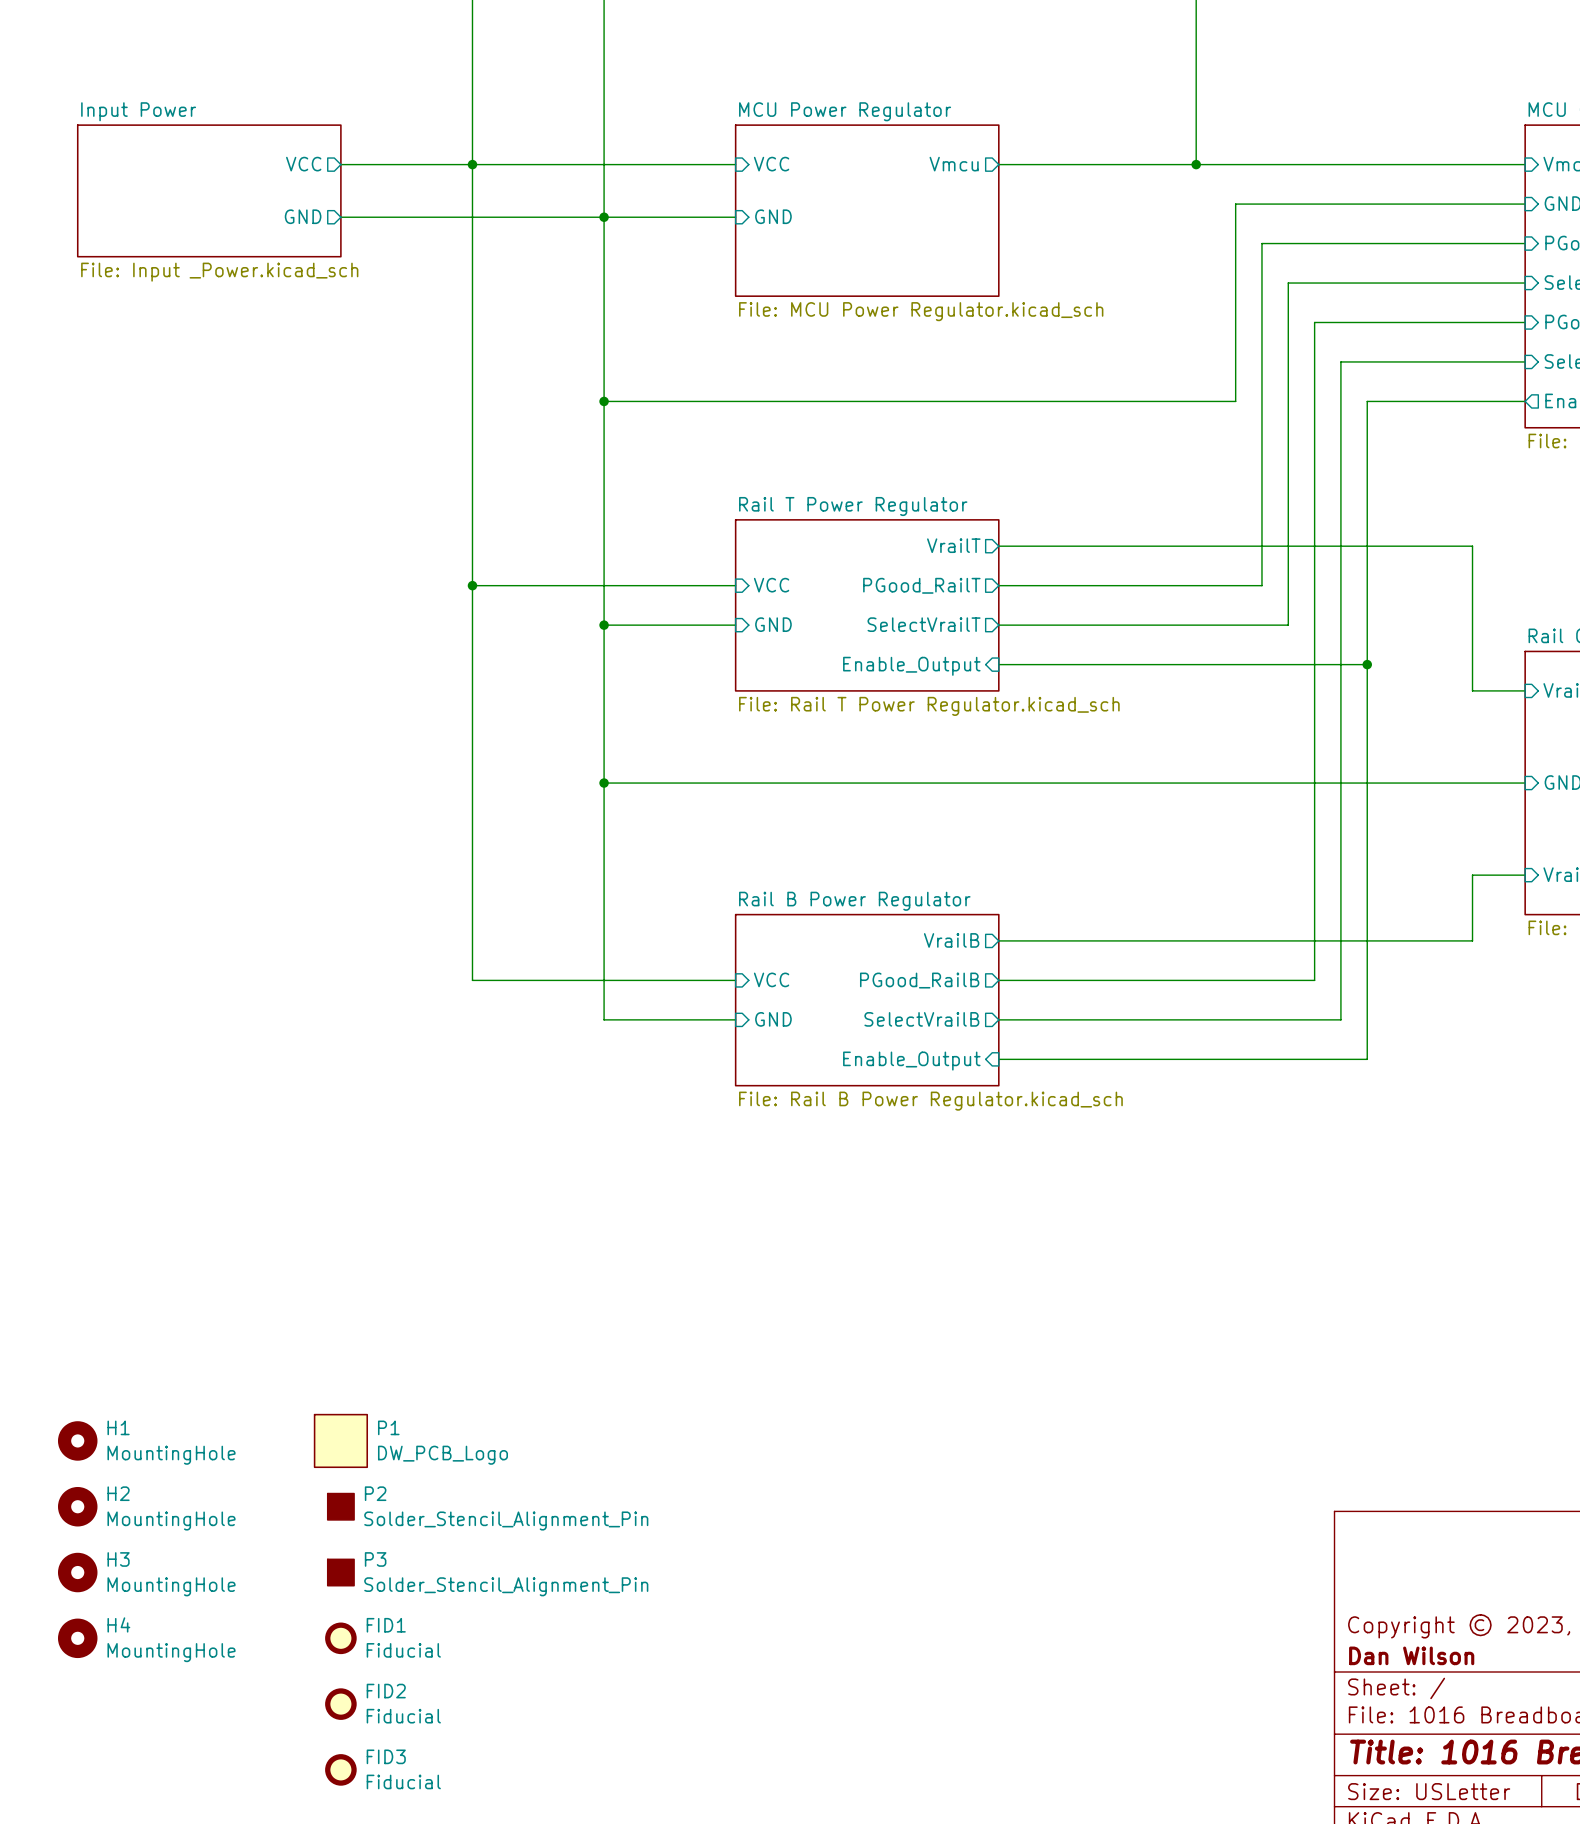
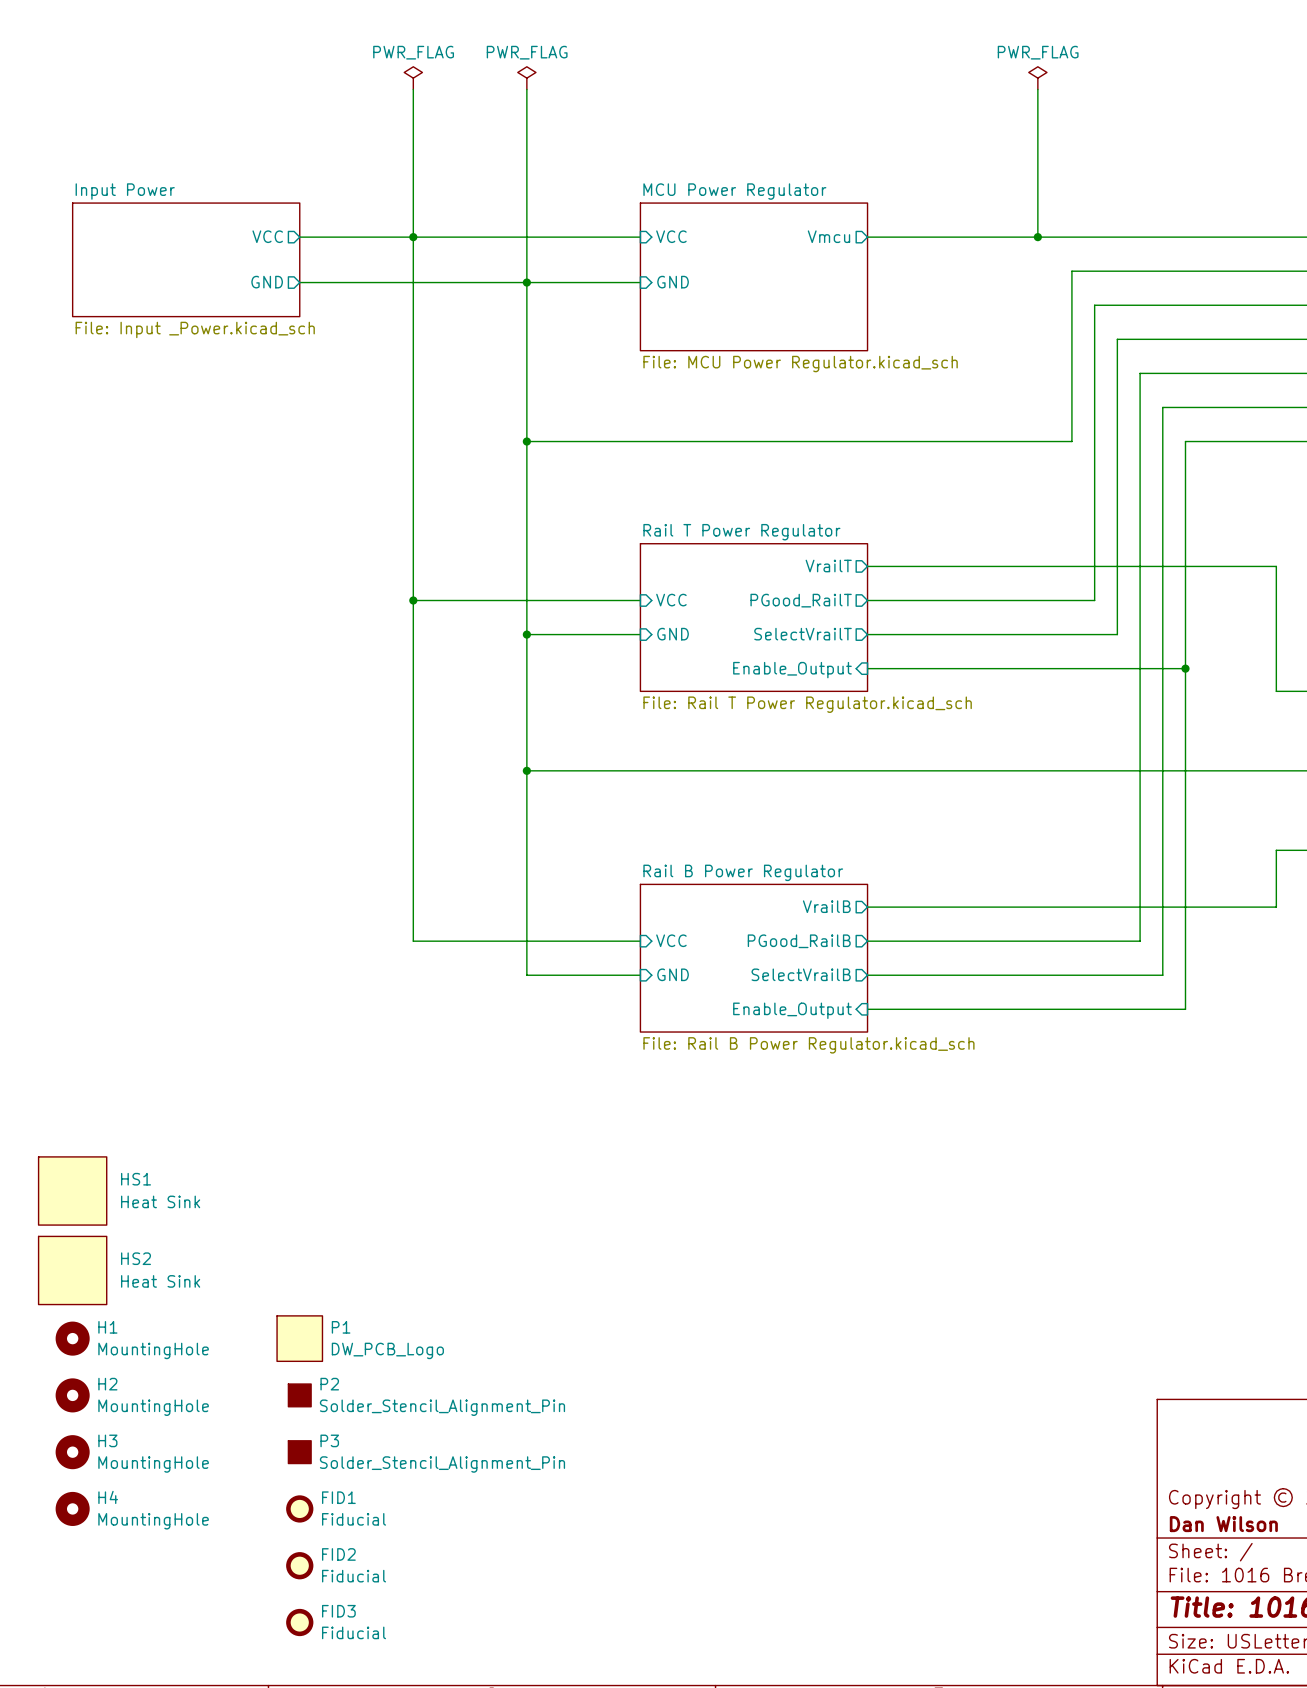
HS1: none -> Heat Sink (72, 1190)
HS2: none -> Heat Sink (72, 1270)

